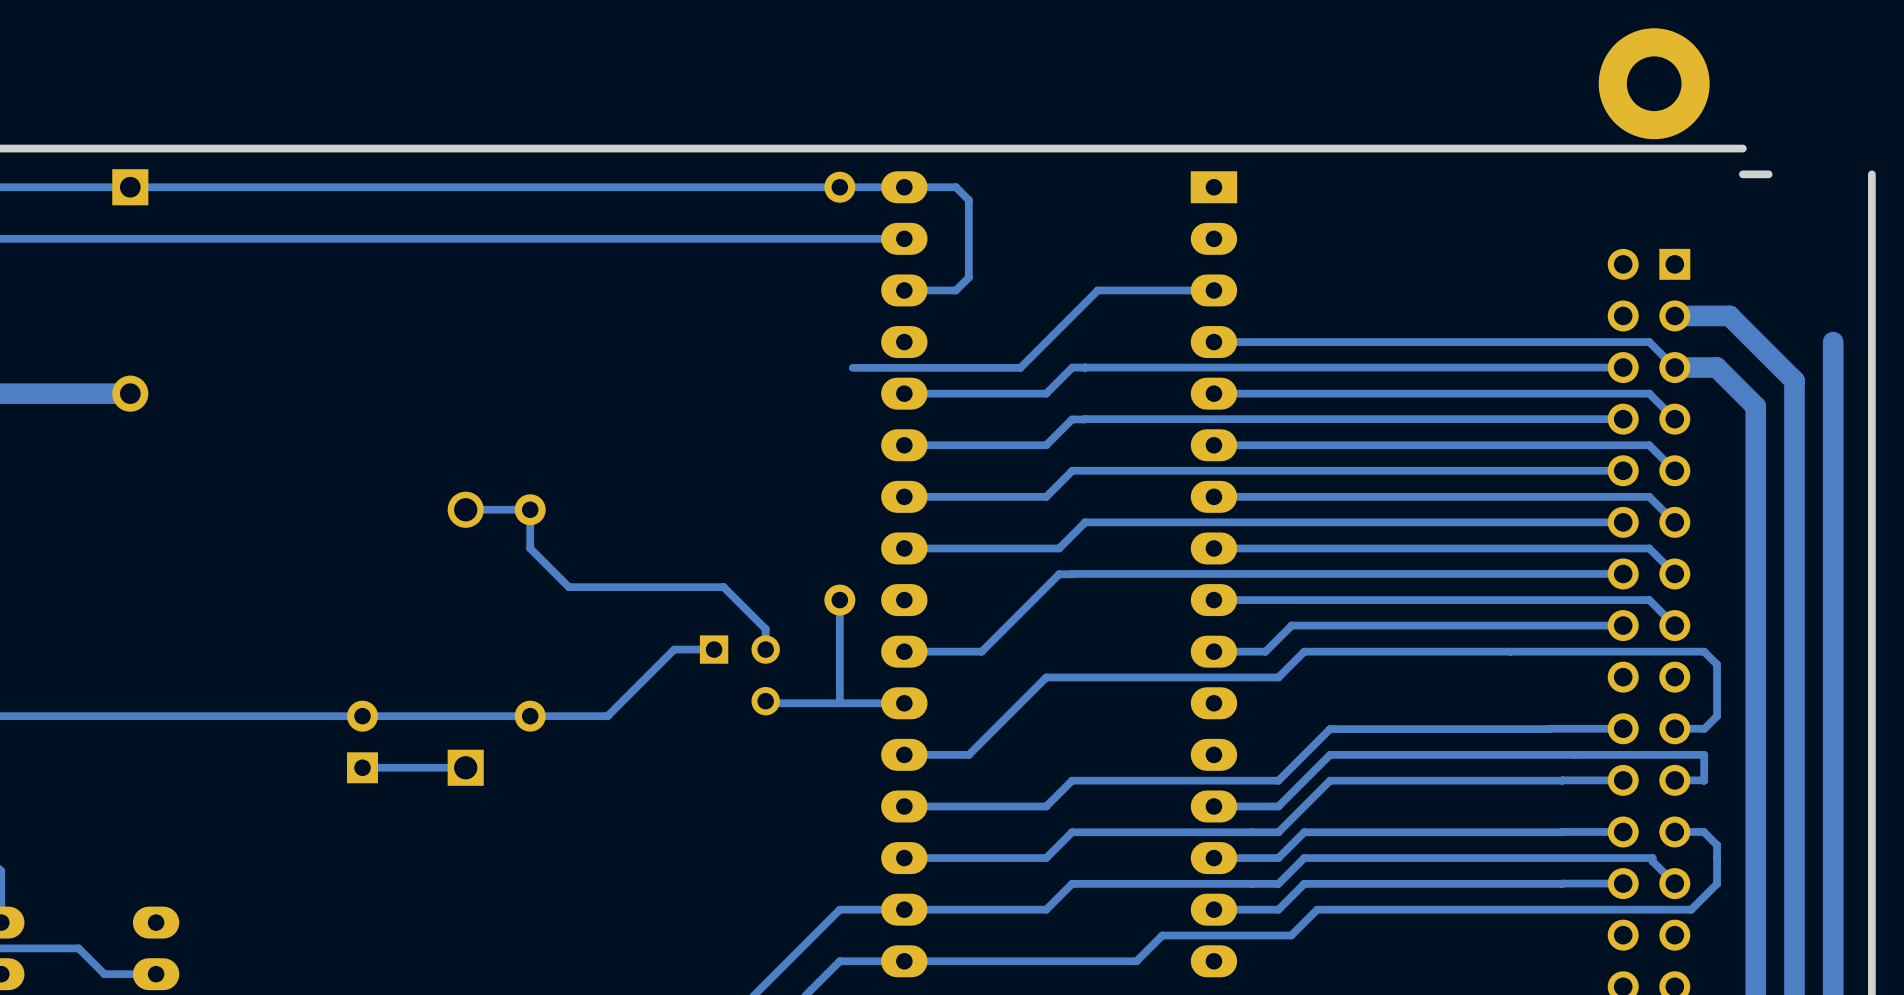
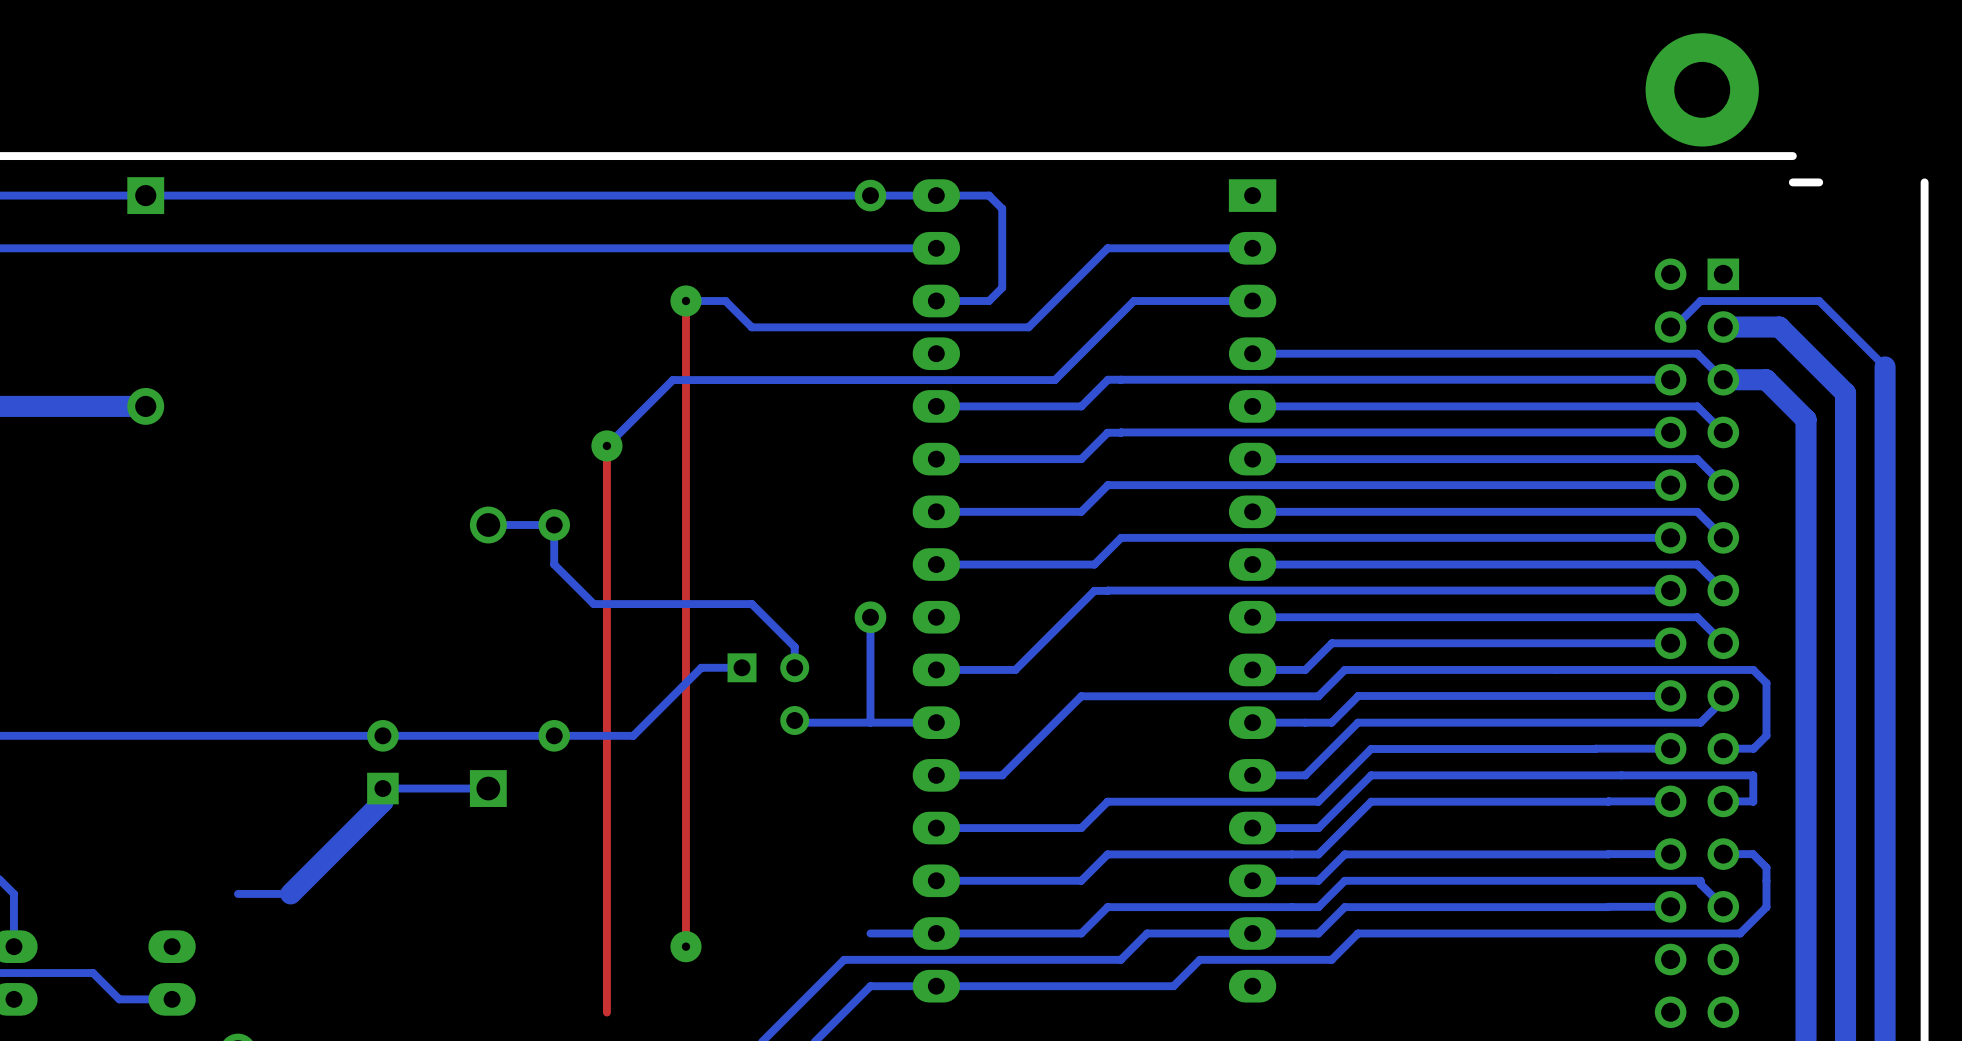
bottom track: none -> (1252, 248) (1107, 248) (1028, 327) (751, 327) (725, 301) (685, 301)
top track: none -> (685, 301) (685, 946)
via: none -> (685, 301)
bottom track: (1833, 342) (1833, 354) -> (1670, 327) (1674, 327) (1700, 301) (1819, 301) (1885, 366)
bottom track: none -> (883, 380) (672, 380) (606, 445)
top track: none -> (606, 445) (606, 1012)
via: none -> (606, 445)
bottom track: none -> (1670, 695) (1358, 695) (1331, 722) (1252, 722)
bottom track: none -> (1723, 695) (1723, 699) (1700, 722) (1358, 722) (1305, 775) (1252, 775)
bottom track: none -> (382, 788) (382, 801) (290, 893) (237, 893)
bottom track: (839, 909) (814, 935) -> (1252, 933) (1147, 933) (1120, 959) (844, 959)
via: none -> (685, 946)

